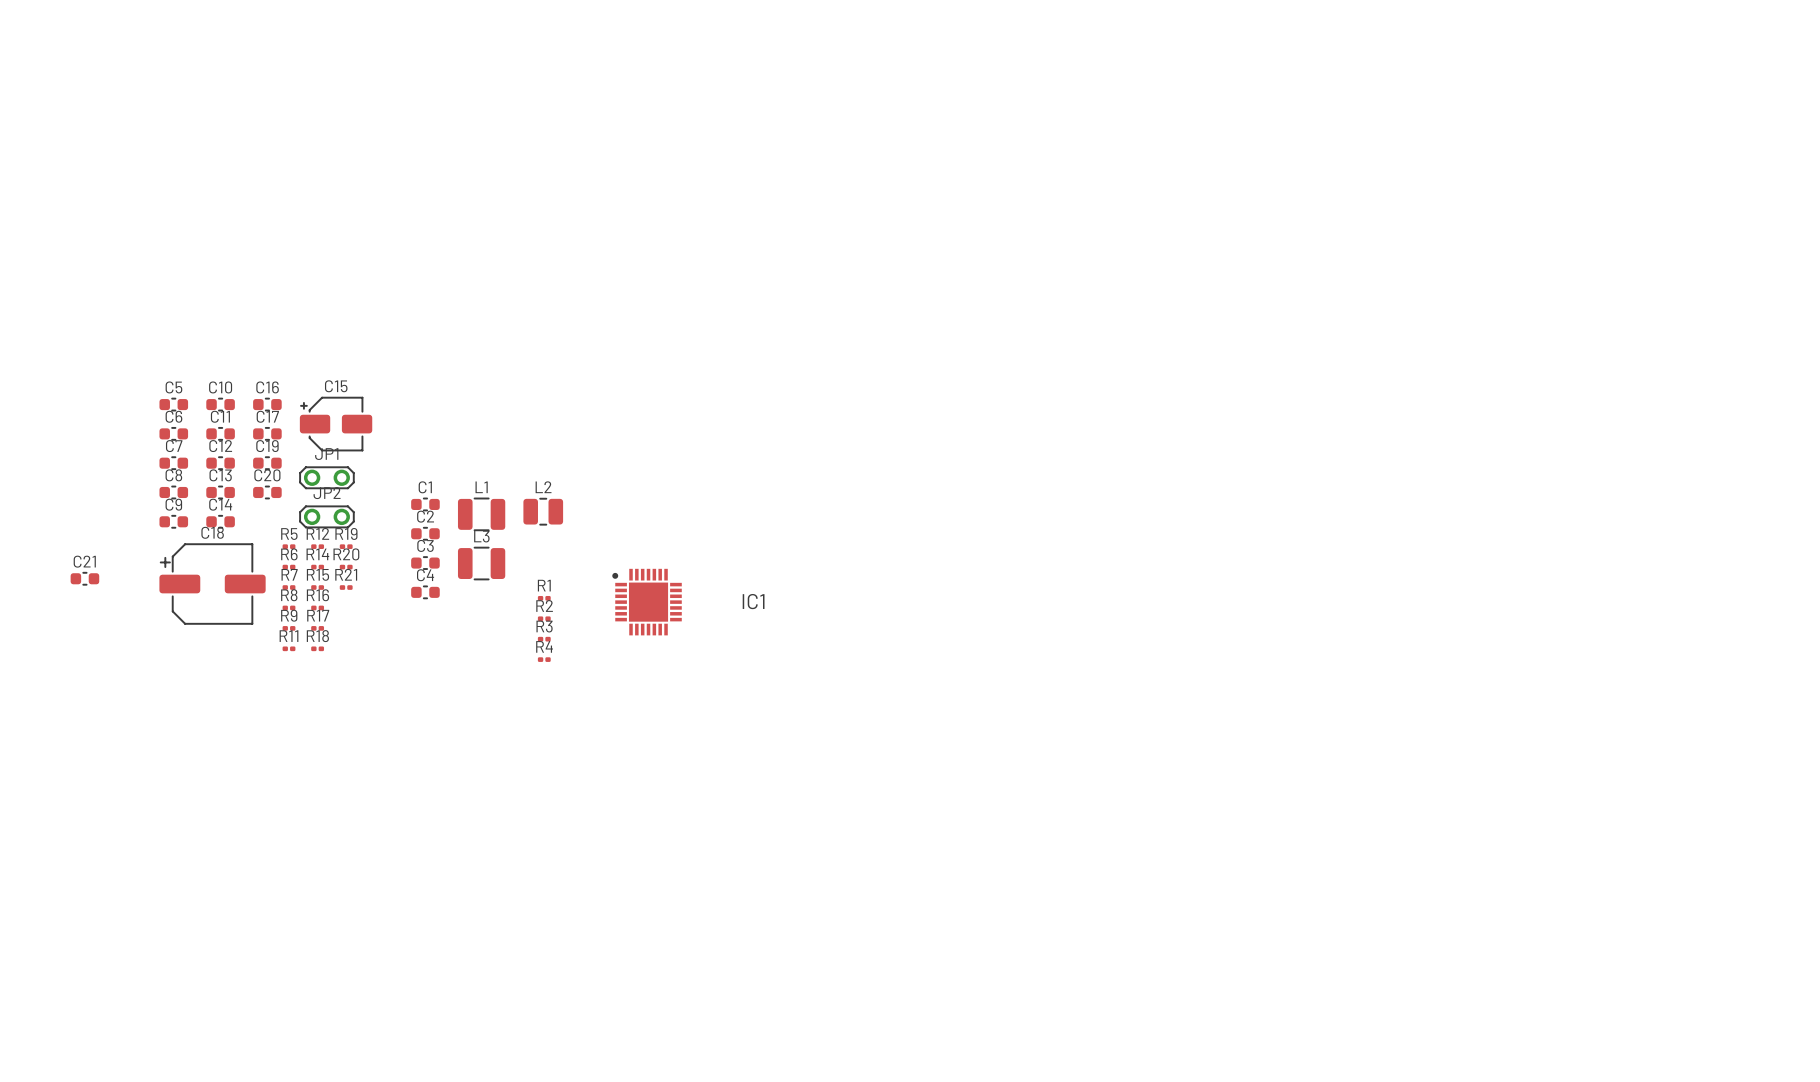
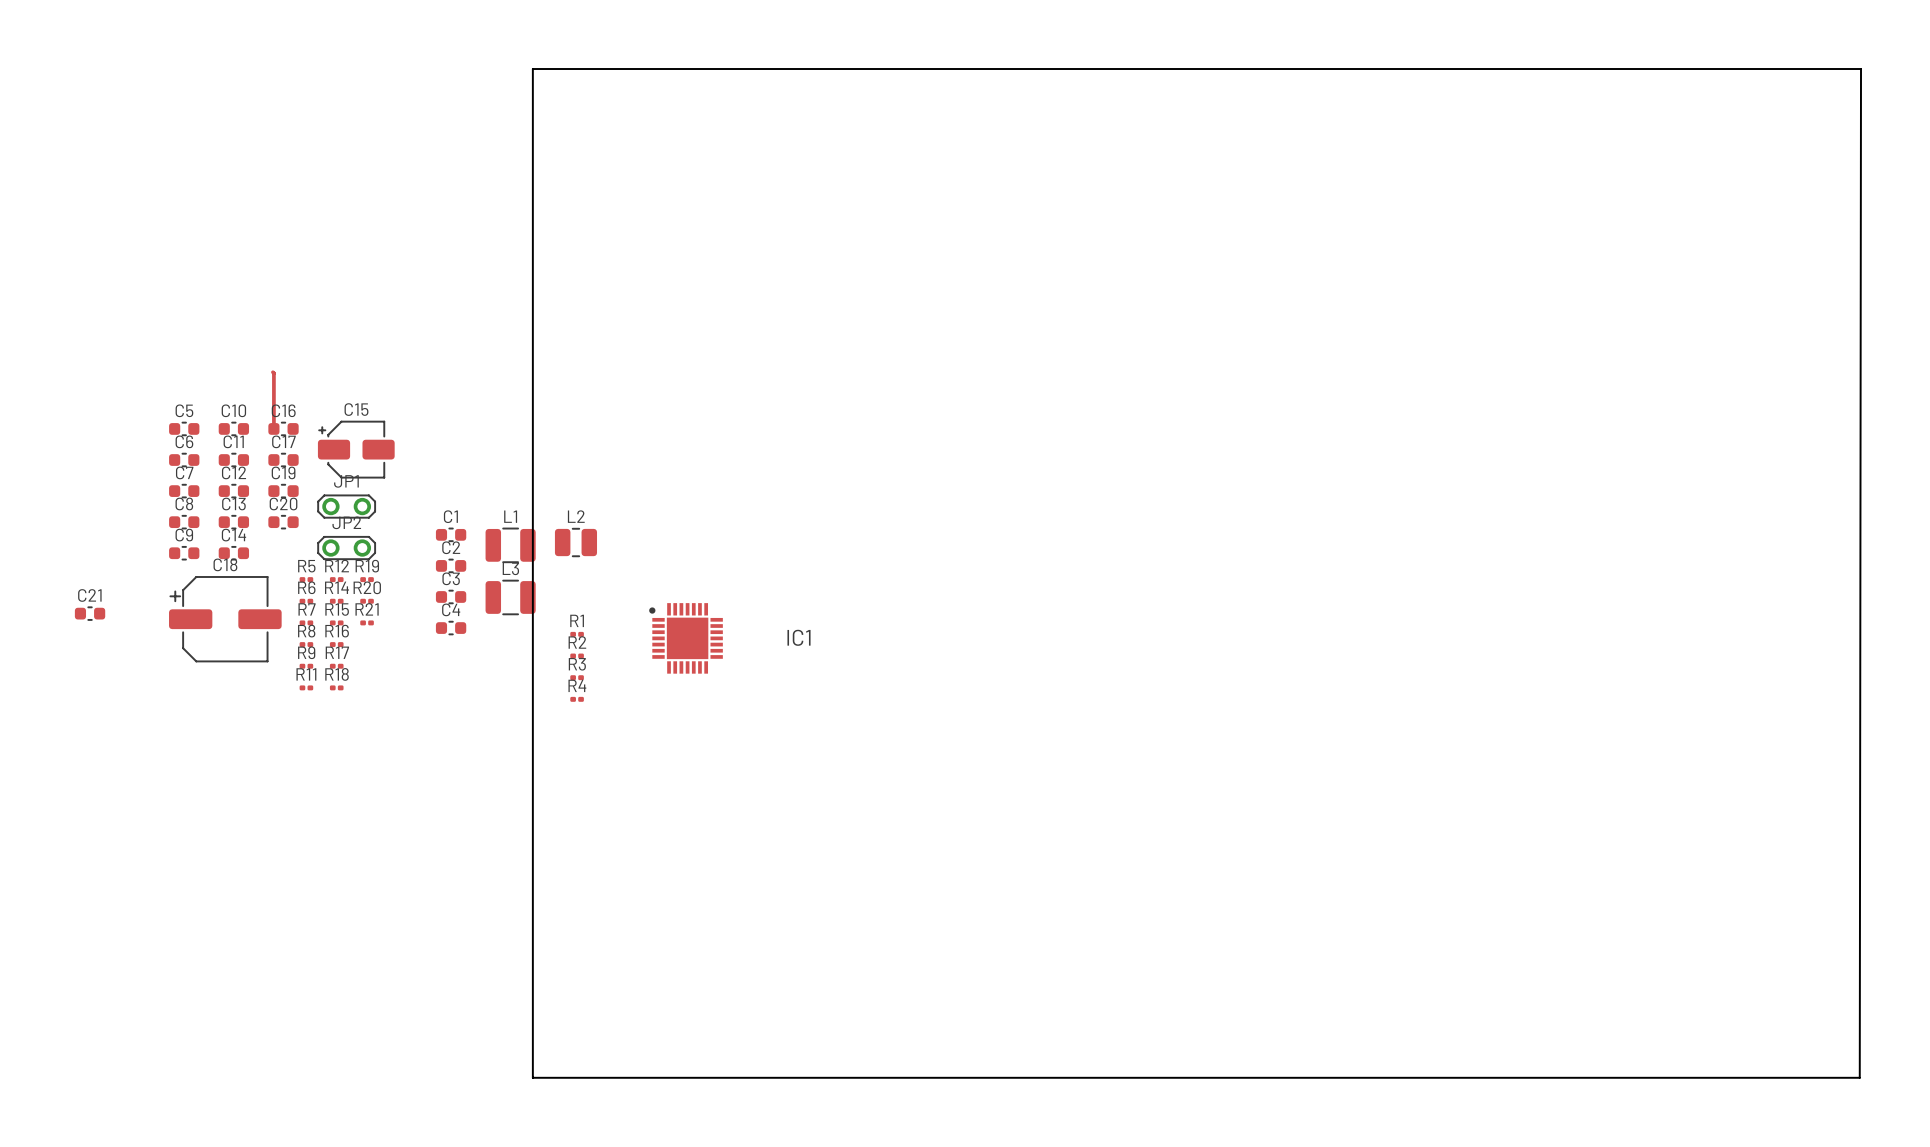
board edge: none -> (532, 69) (532, 1077) (1859, 1077) (1861, 69) (532, 69)
track: none -> (272, 372) (273, 428)

